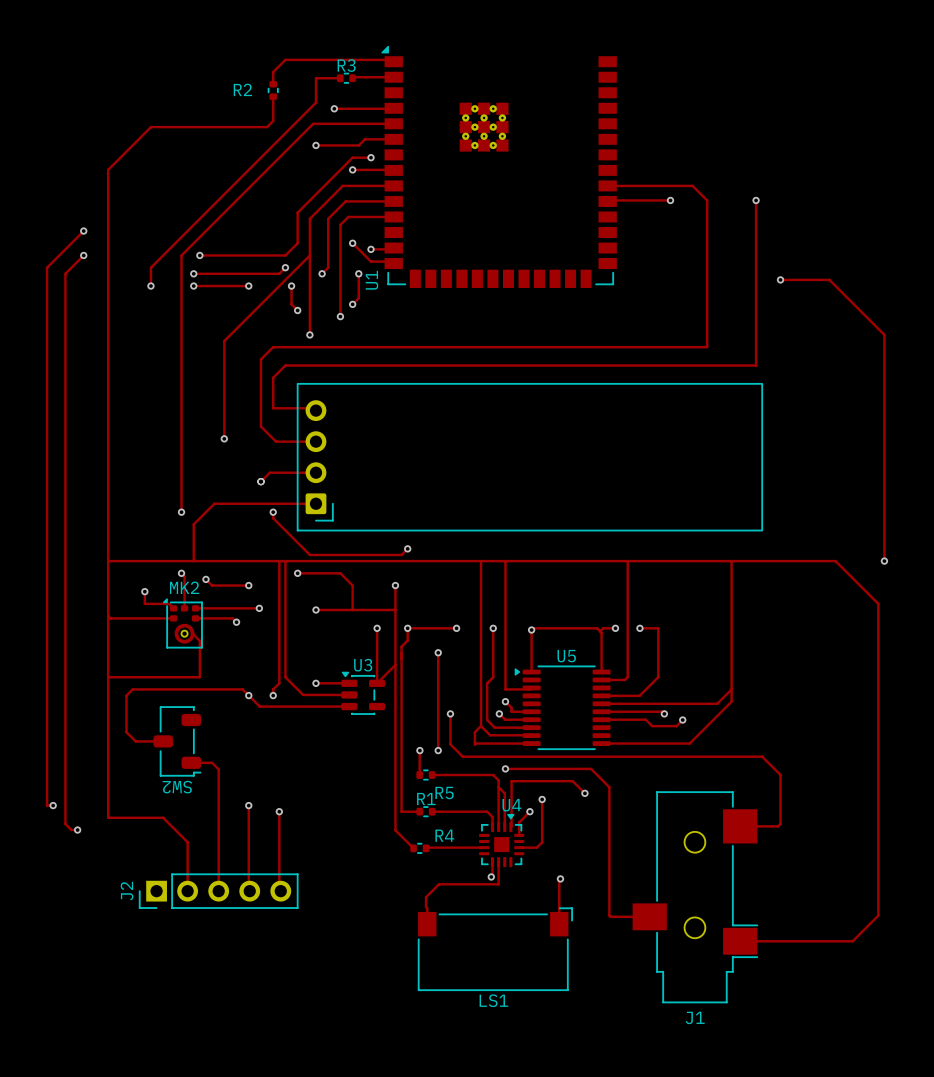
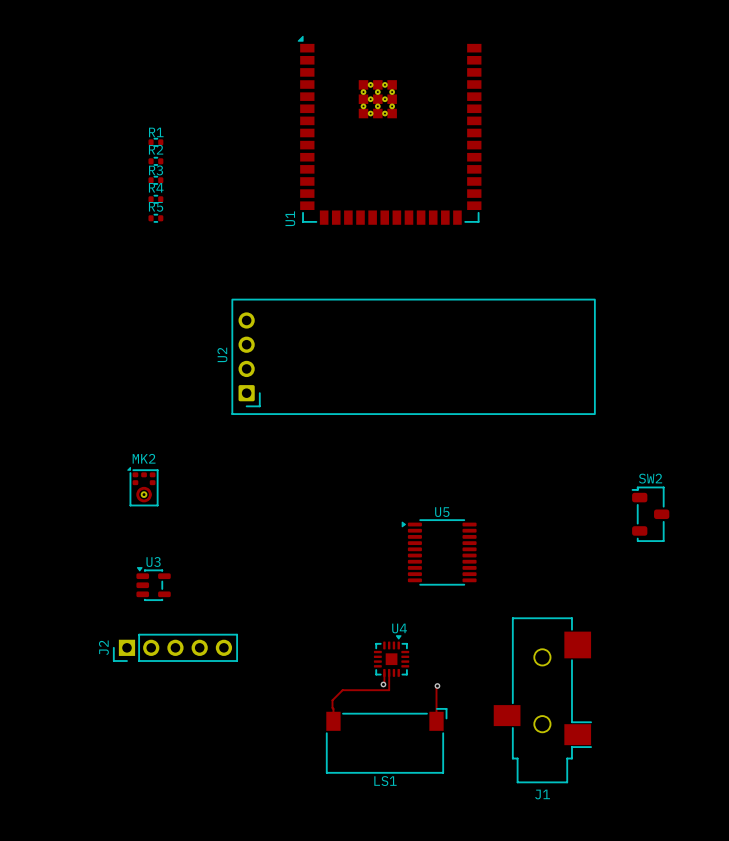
track: (389, 59) (285, 59) (273, 72) (273, 84) -> none
track: (353, 77) (393, 77) -> none
track: (340, 78) (315, 78) (315, 102) (150, 267) (150, 286) -> none
R3 position: (346, 78) -> (155, 180)
R2 rotation: 0° (273, 90) -> 90° clockwise (155, 161)
R2 position: (273, 90) -> (155, 161)
track: (273, 96) (273, 121) (267, 127) (150, 127) (108, 169) (108, 817) (163, 817) (187, 842) (187, 891) -> none
via: (334, 108) -> none
track: (393, 108) (334, 108) -> none
track: (393, 123) (313, 123) (181, 255) (181, 512) -> none
track: (393, 139) (364, 139) (358, 145) (315, 145) -> none
via: (315, 145) -> none
track: (371, 157) (352, 157) (297, 212) (297, 243) (285, 255) (199, 255) -> none
via: (371, 157) -> none
track: (352, 169) (393, 170) -> none
via: (352, 169) -> none
track: (393, 185) (342, 185) (309, 218) (309, 334) -> none
track: (607, 185) (692, 185) (707, 200) (707, 347) (273, 347) (260, 359) (260, 426) (276, 441) (315, 441) -> none
track: (670, 200) (607, 201) -> none
via: (670, 200) -> none
track: (756, 200) (756, 365) (285, 365) (273, 377) (273, 408) (313, 408) (315, 410) -> none
via: (756, 200) -> none
track: (393, 201) (345, 201) (328, 218) (328, 267) (322, 273) -> none
track: (393, 216) (348, 216) (340, 224) (340, 316) -> none
track: (83, 231) (47, 267) (47, 805) (53, 805) -> none
via: (83, 231) -> none
track: (352, 243) (371, 261) (391, 261) (393, 263) -> none
via: (352, 243) -> none
track: (393, 248) (371, 249) -> none
via: (371, 249) -> none
track: (83, 255) (65, 273) (65, 823) (71, 830) (77, 830) -> none
via: (83, 255) -> none
via: (199, 255) -> none
track: (309, 255) (224, 341) (224, 438) -> none
track: (285, 267) (279, 273) (193, 273) -> none
via: (285, 267) -> none
via: (193, 273) -> none
via: (322, 273) -> none
track: (358, 273) (358, 298) (352, 304) -> none
via: (358, 273) -> none
track: (780, 279) (829, 279) (884, 334) (884, 561) -> none
via: (780, 279) -> none
via: (150, 286) -> none
track: (193, 286) (248, 286) -> none
via: (193, 286) -> none
via: (248, 286) -> none
track: (291, 286) (291, 304) (297, 310) -> none
via: (291, 286) -> none
via: (352, 304) -> none
via: (297, 310) -> none
via: (340, 316) -> none
via: (309, 334) -> none
via: (224, 438) -> none
U2 name: none -> U2 (222, 354)
track: (315, 472) (269, 472) (260, 481) -> none
via: (260, 481) -> none
track: (315, 503) (214, 503) (193, 524) (193, 561) -> none
via: (181, 512) -> none
track: (273, 512) (273, 518) (309, 554) (401, 554) (407, 548) -> none
via: (273, 512) -> none
via: (407, 548) -> none
track: (108, 561) (835, 561) (878, 603) (878, 915) (852, 941) (740, 941) -> none
track: (279, 561) (279, 683) (273, 689) (273, 695) -> none
track: (285, 561) (285, 677) (303, 694) (349, 694) -> none
track: (481, 561) (481, 726) -> none
track: (505, 561) (505, 689) (531, 687) -> none
track: (627, 561) (627, 677) (624, 679) (601, 679) -> none
track: (731, 561) (731, 701) (689, 743) (601, 743) -> none
via: (884, 561) -> none
track: (181, 573) (184, 576) (184, 608) -> none
via: (181, 573) -> none
track: (297, 573) (340, 573) (352, 585) (352, 609) -> none
via: (297, 573) -> none
track: (205, 579) (212, 585) (248, 585) -> none
via: (205, 579) -> none
via: (248, 585) -> none
track: (395, 585) (395, 830) (413, 848) -> none
via: (395, 585) -> none
track: (144, 591) (144, 603) (169, 603) (173, 608) -> none
via: (144, 591) -> none
track: (195, 608) (259, 608) (260, 609) -> none
via: (259, 608) -> none
track: (315, 609) (395, 609) -> none
via: (315, 609) -> none
track: (108, 616) (110, 618) (173, 618) -> none
track: (195, 618) (232, 618) (236, 622) -> none
via: (236, 622) -> none
track: (377, 628) (377, 683) (395, 665) -> none
via: (377, 628) -> none
via: (407, 628) -> none
track: (456, 628) (407, 628) (407, 640) (401, 646) (401, 811) (419, 811) -> none
via: (456, 628) -> none
track: (493, 628) (493, 677) (487, 683) (487, 720) (494, 727) (531, 727) -> none
via: (493, 628) -> none
track: (615, 628) (603, 628) (600, 631) -> none
via: (615, 628) -> none
track: (639, 628) (658, 628) (658, 677) (639, 695) (601, 695) -> none
via: (639, 628) -> none
track: (531, 630) (531, 672) -> none
track: (531, 630) (533, 628) (597, 628) (601, 632) (601, 672) -> none
via: (531, 630) -> none
track: (192, 633) (199, 640) (199, 677) (108, 677) -> none
track: (438, 652) (438, 750) -> none
via: (438, 652) -> none
track: (315, 683) (349, 683) -> none
via: (315, 683) -> none
track: (731, 689) (717, 703) (601, 703) -> none
U3 position: (363, 693) -> (153, 583)
via: (248, 695) -> none
via: (273, 695) -> none
track: (505, 701) (511, 707) (511, 711) (531, 711) -> none
via: (505, 701) -> none
track: (349, 706) (259, 706) (242, 689) (132, 689) (126, 695) (126, 732) (135, 741) (163, 741) -> none
track: (601, 711) (662, 711) (664, 713) -> none
track: (450, 713) (450, 744) (462, 756) (762, 756) (780, 775) (780, 823) (778, 826) (740, 826) -> none
via: (450, 713) -> none
track: (499, 713) (505, 719) (531, 719) -> none
via: (499, 713) -> none
via: (664, 713) -> none
track: (601, 720) (645, 719) (652, 726) (676, 726) (682, 720) -> none
via: (682, 720) -> none
track: (481, 726) (490, 735) (531, 735) -> none
track: (481, 726) (474, 732) (474, 744) (531, 743) -> none
SW2 rotation: 0° (177, 741) -> 180° (650, 514)
SW2 position: (177, 741) -> (650, 514)
track: (419, 750) (419, 775) -> none
via: (419, 750) -> none
via: (438, 750) -> none
track: (191, 762) (212, 762) (218, 769) (218, 891) -> none
track: (505, 768) (591, 768) (609, 787) (609, 915) (649, 916) -> none
via: (505, 768) -> none
R5 position: (425, 775) -> (155, 218)
track: (432, 775) (493, 775) (498, 780) (498, 827) -> none
track: (498, 787) (504, 793) (504, 827) -> none
R5 name position: R5 (444, 793) -> R5 (156, 206)
track: (584, 793) (572, 781) (511, 781) (510, 827) -> none
via: (584, 793) -> none
track: (542, 799) (542, 842) (536, 847) (519, 847) -> none
via: (542, 799) -> none
via: (53, 805) -> none
track: (248, 805) (249, 891) -> none
via: (248, 805) -> none
track: (279, 811) (280, 891) -> none
via: (279, 811) -> none
R1 position: (425, 811) -> (155, 142)
track: (432, 811) (487, 811) (492, 817) (492, 827) -> none
track: (529, 811) (519, 822) (519, 835) -> none
via: (529, 811) -> none
via: (77, 830) -> none
R4 name position: R4 (444, 835) -> R4 (156, 187)
track: (484, 847) (426, 848) -> none
R4 position: (419, 848) -> (155, 199)
J2 position: (218, 891) -> (175, 647)

